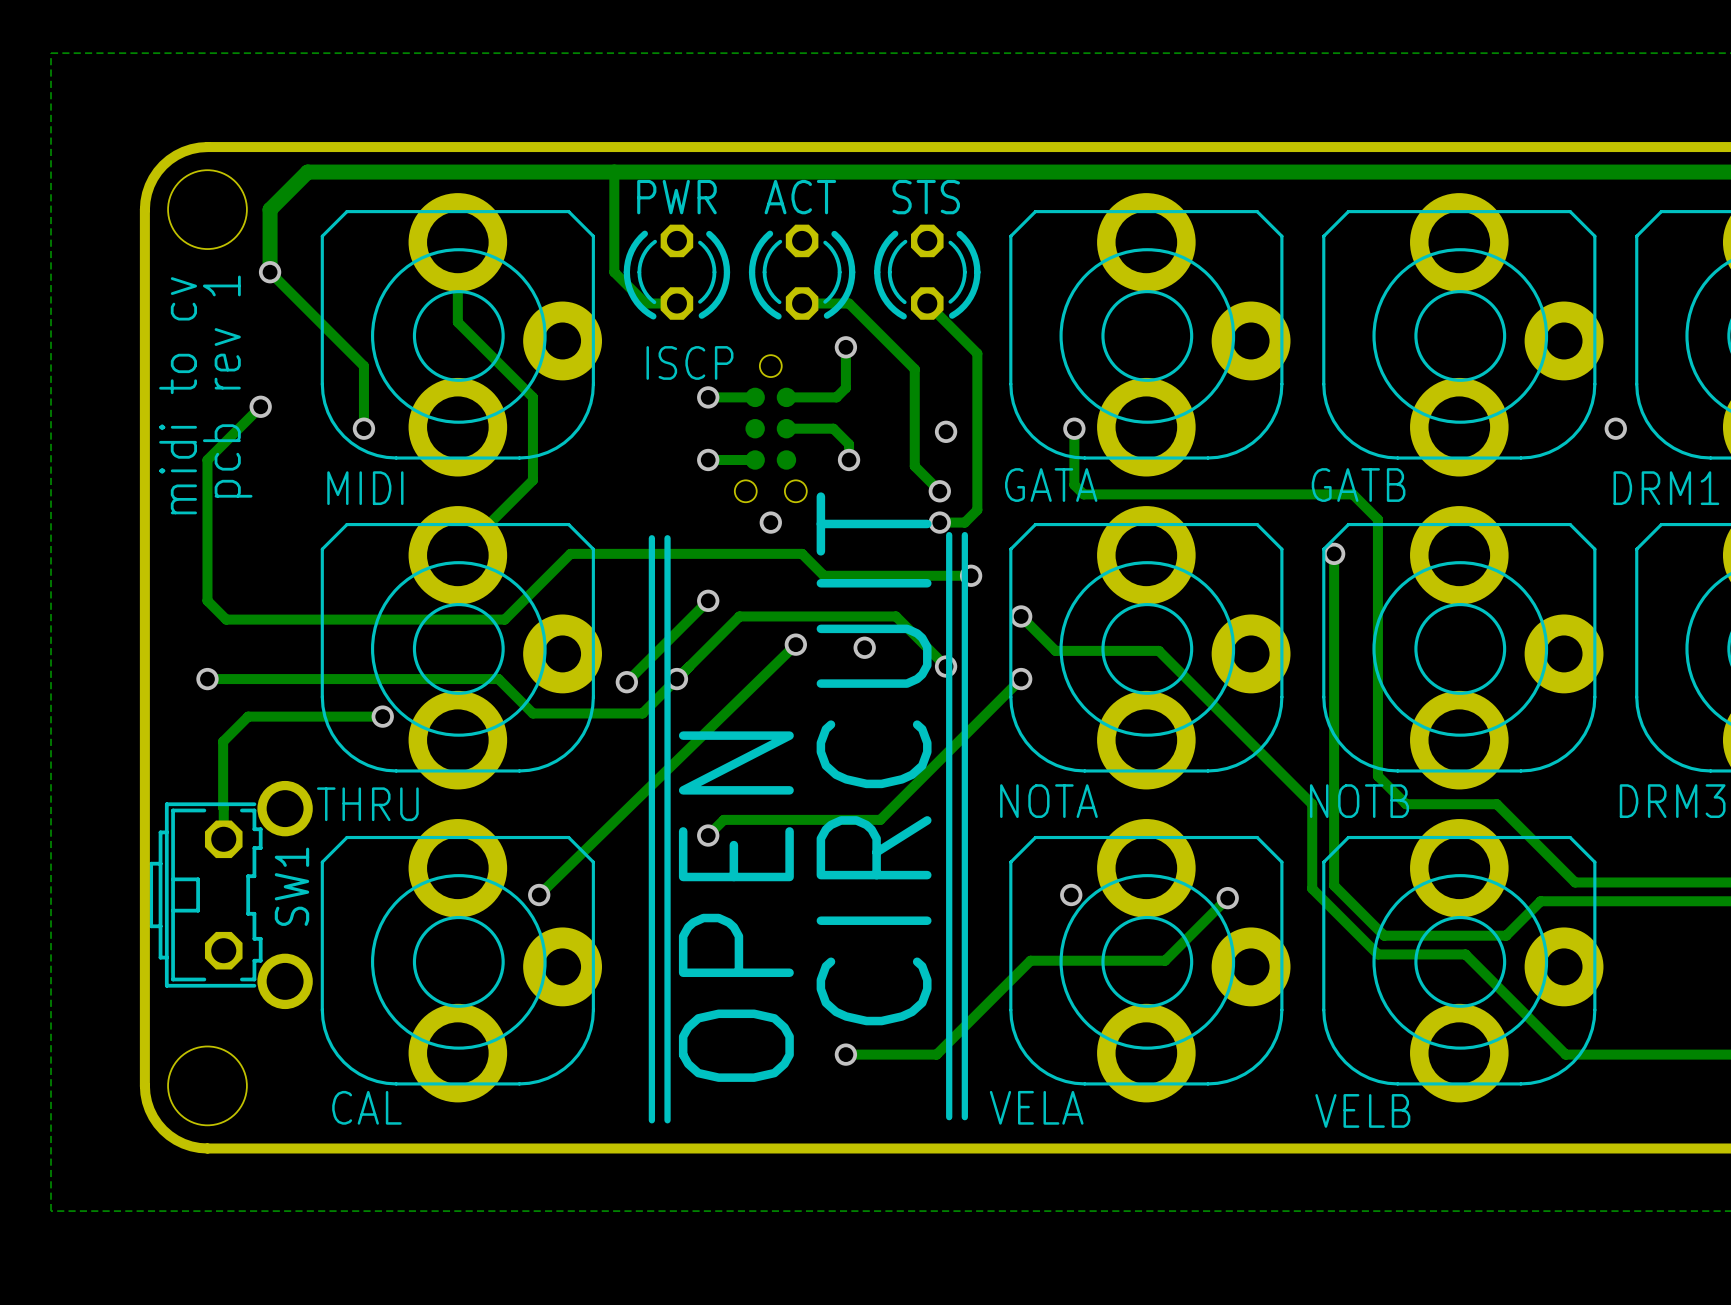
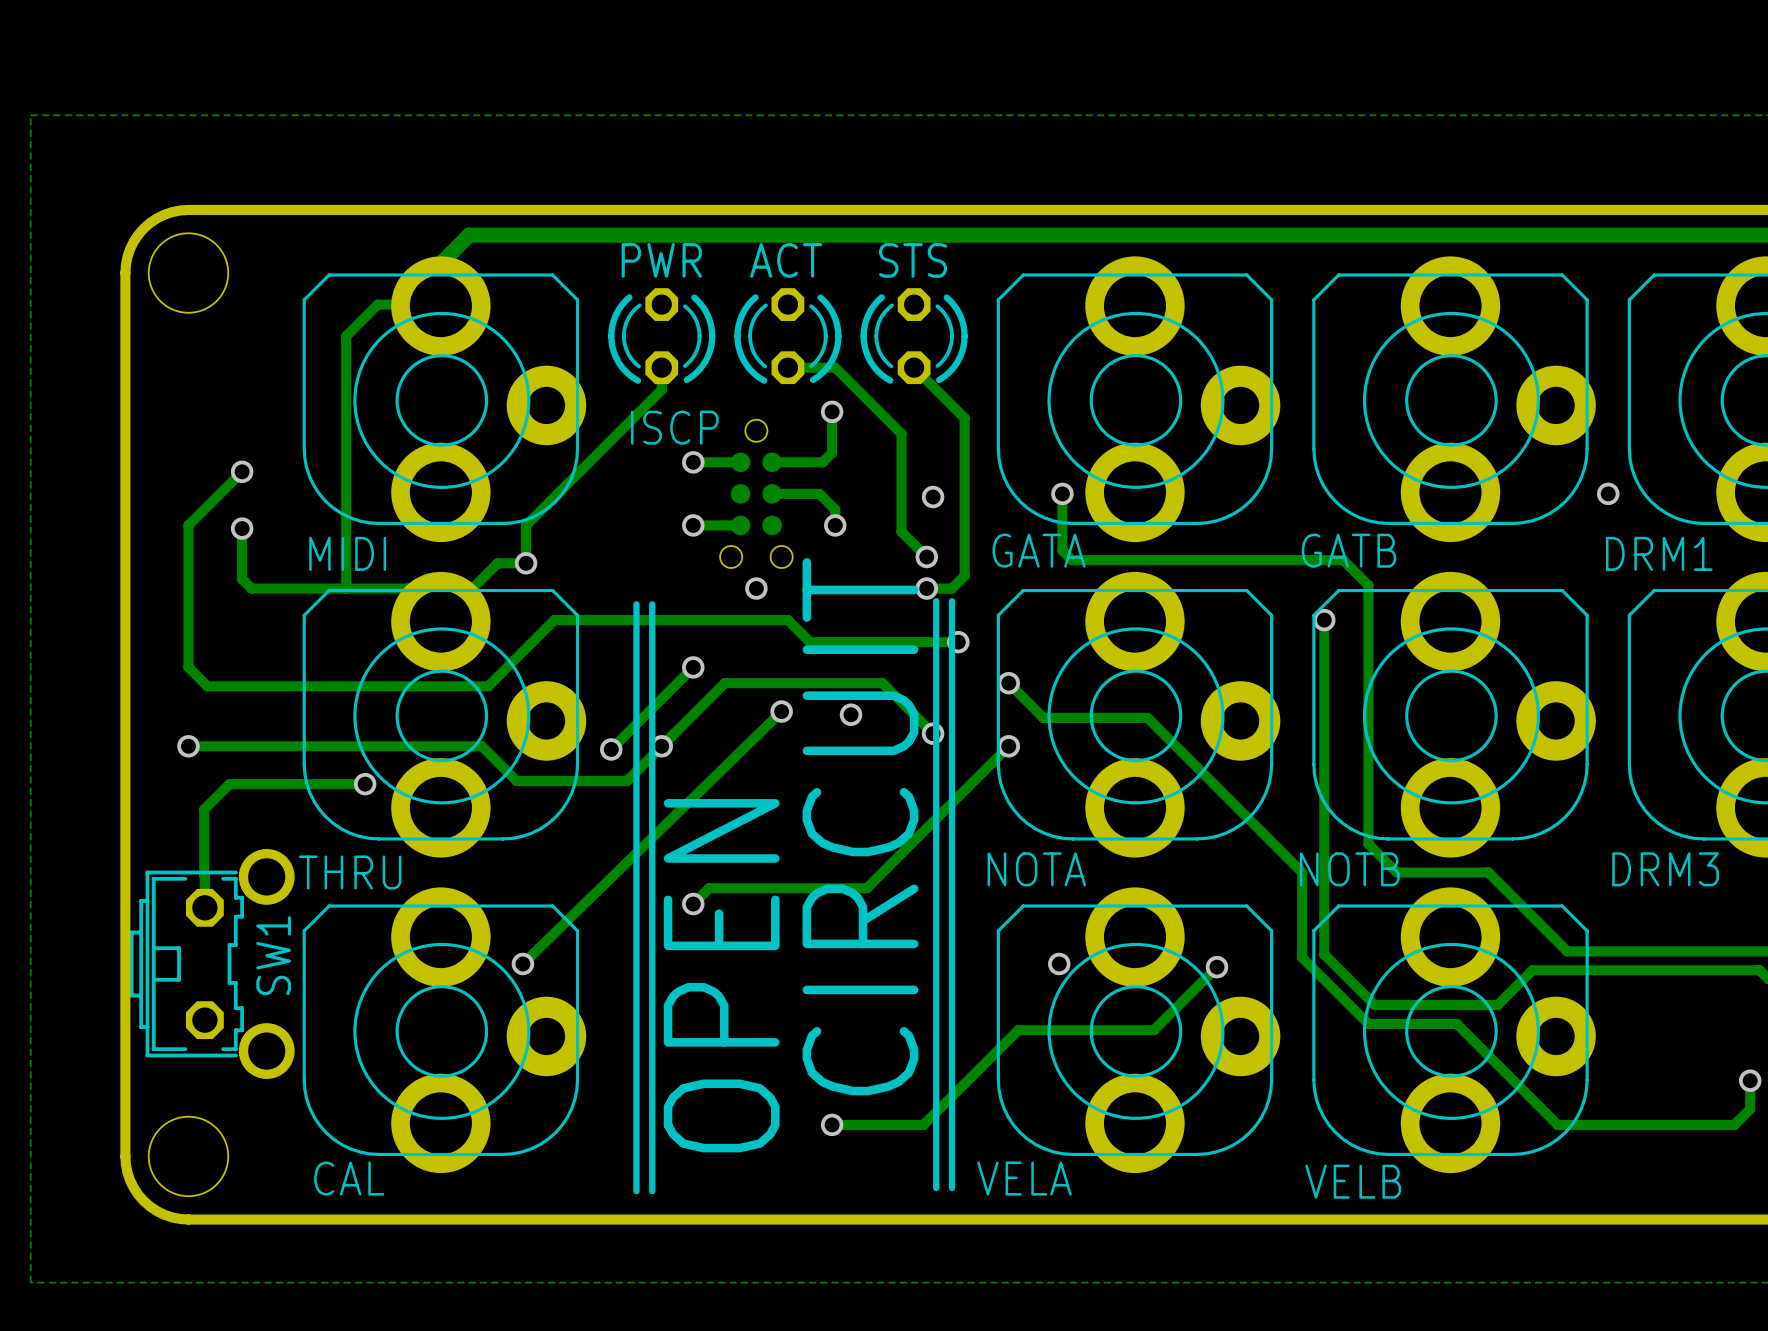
track: (486, 172) (307, 172) (270, 209) (270, 272) (363, 366) -> (469, 235) (440, 263) (440, 306) (377, 304) (346, 336) (346, 430)
track: (614, 172) (614, 272) (645, 303) (676, 303) -> (242, 528) (242, 579) (251, 588) (407, 588) (440, 621) (497, 563) (526, 563) (526, 525) (661, 389) (661, 367)
track: (456, 242) (457, 322) (532, 397) (532, 480) (457, 555) -> none
via: (270, 272) -> none
text: pcb rev 1 (227, 386) -> none
text: midi to cv (178, 395) -> none
track: none -> (346, 493) (346, 588)
via: (363, 428) -> none
via: none -> (242, 528)
via: none -> (526, 563)

